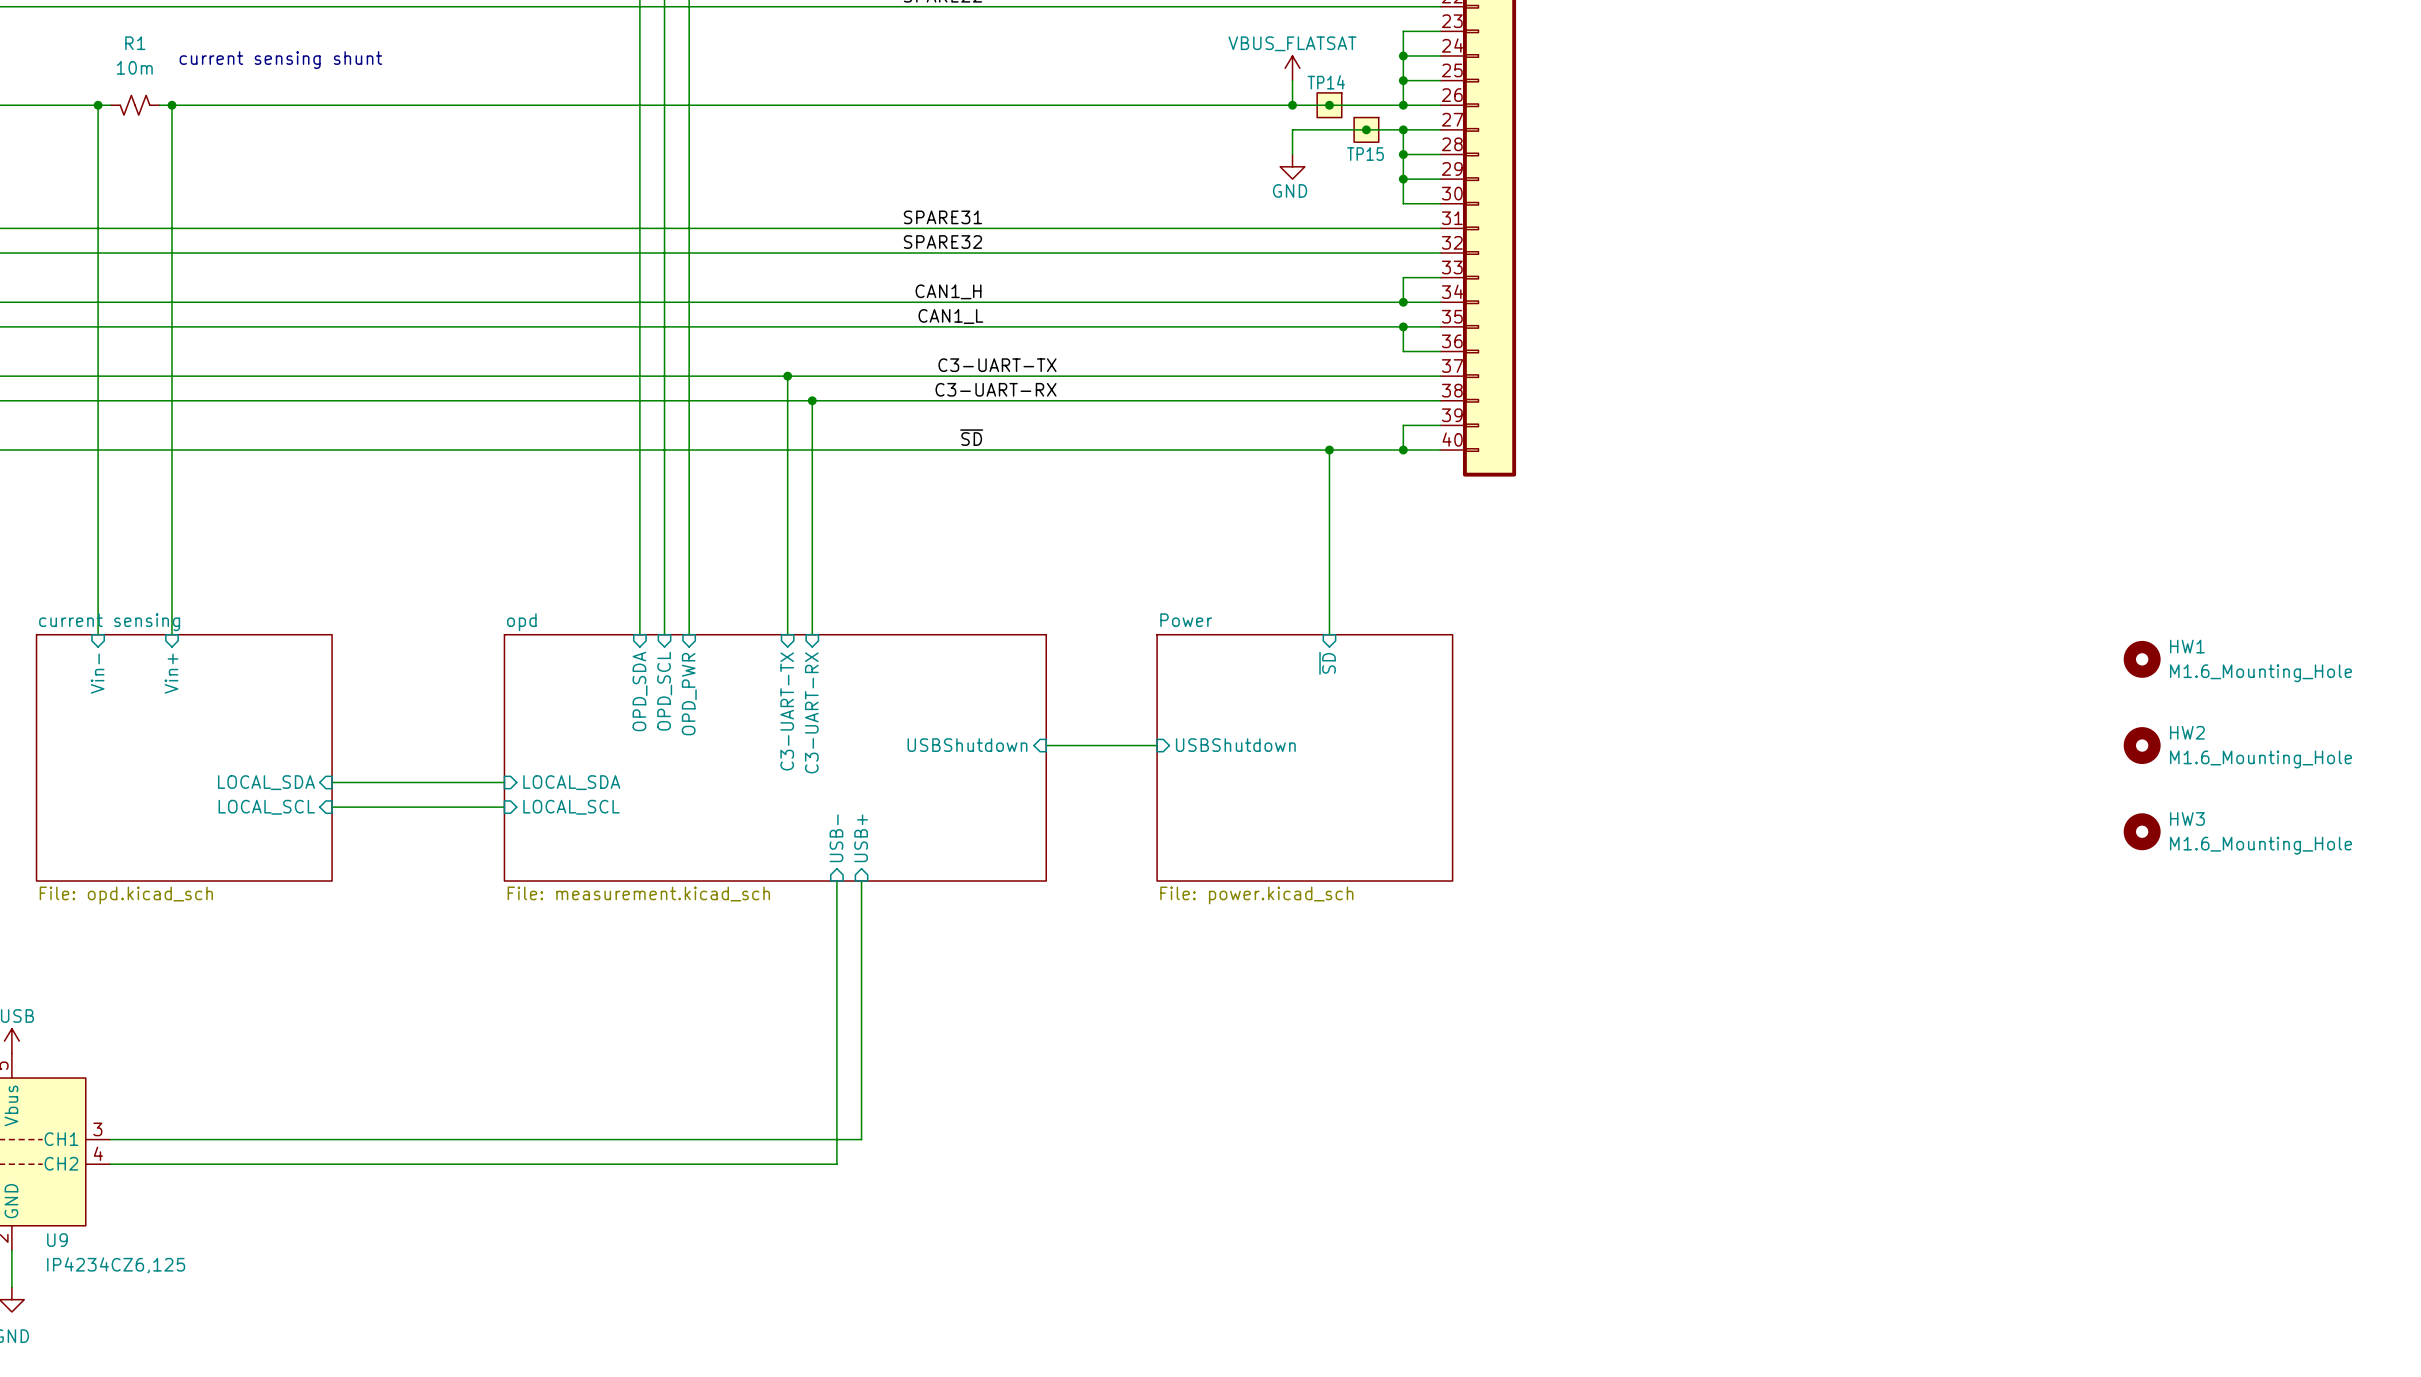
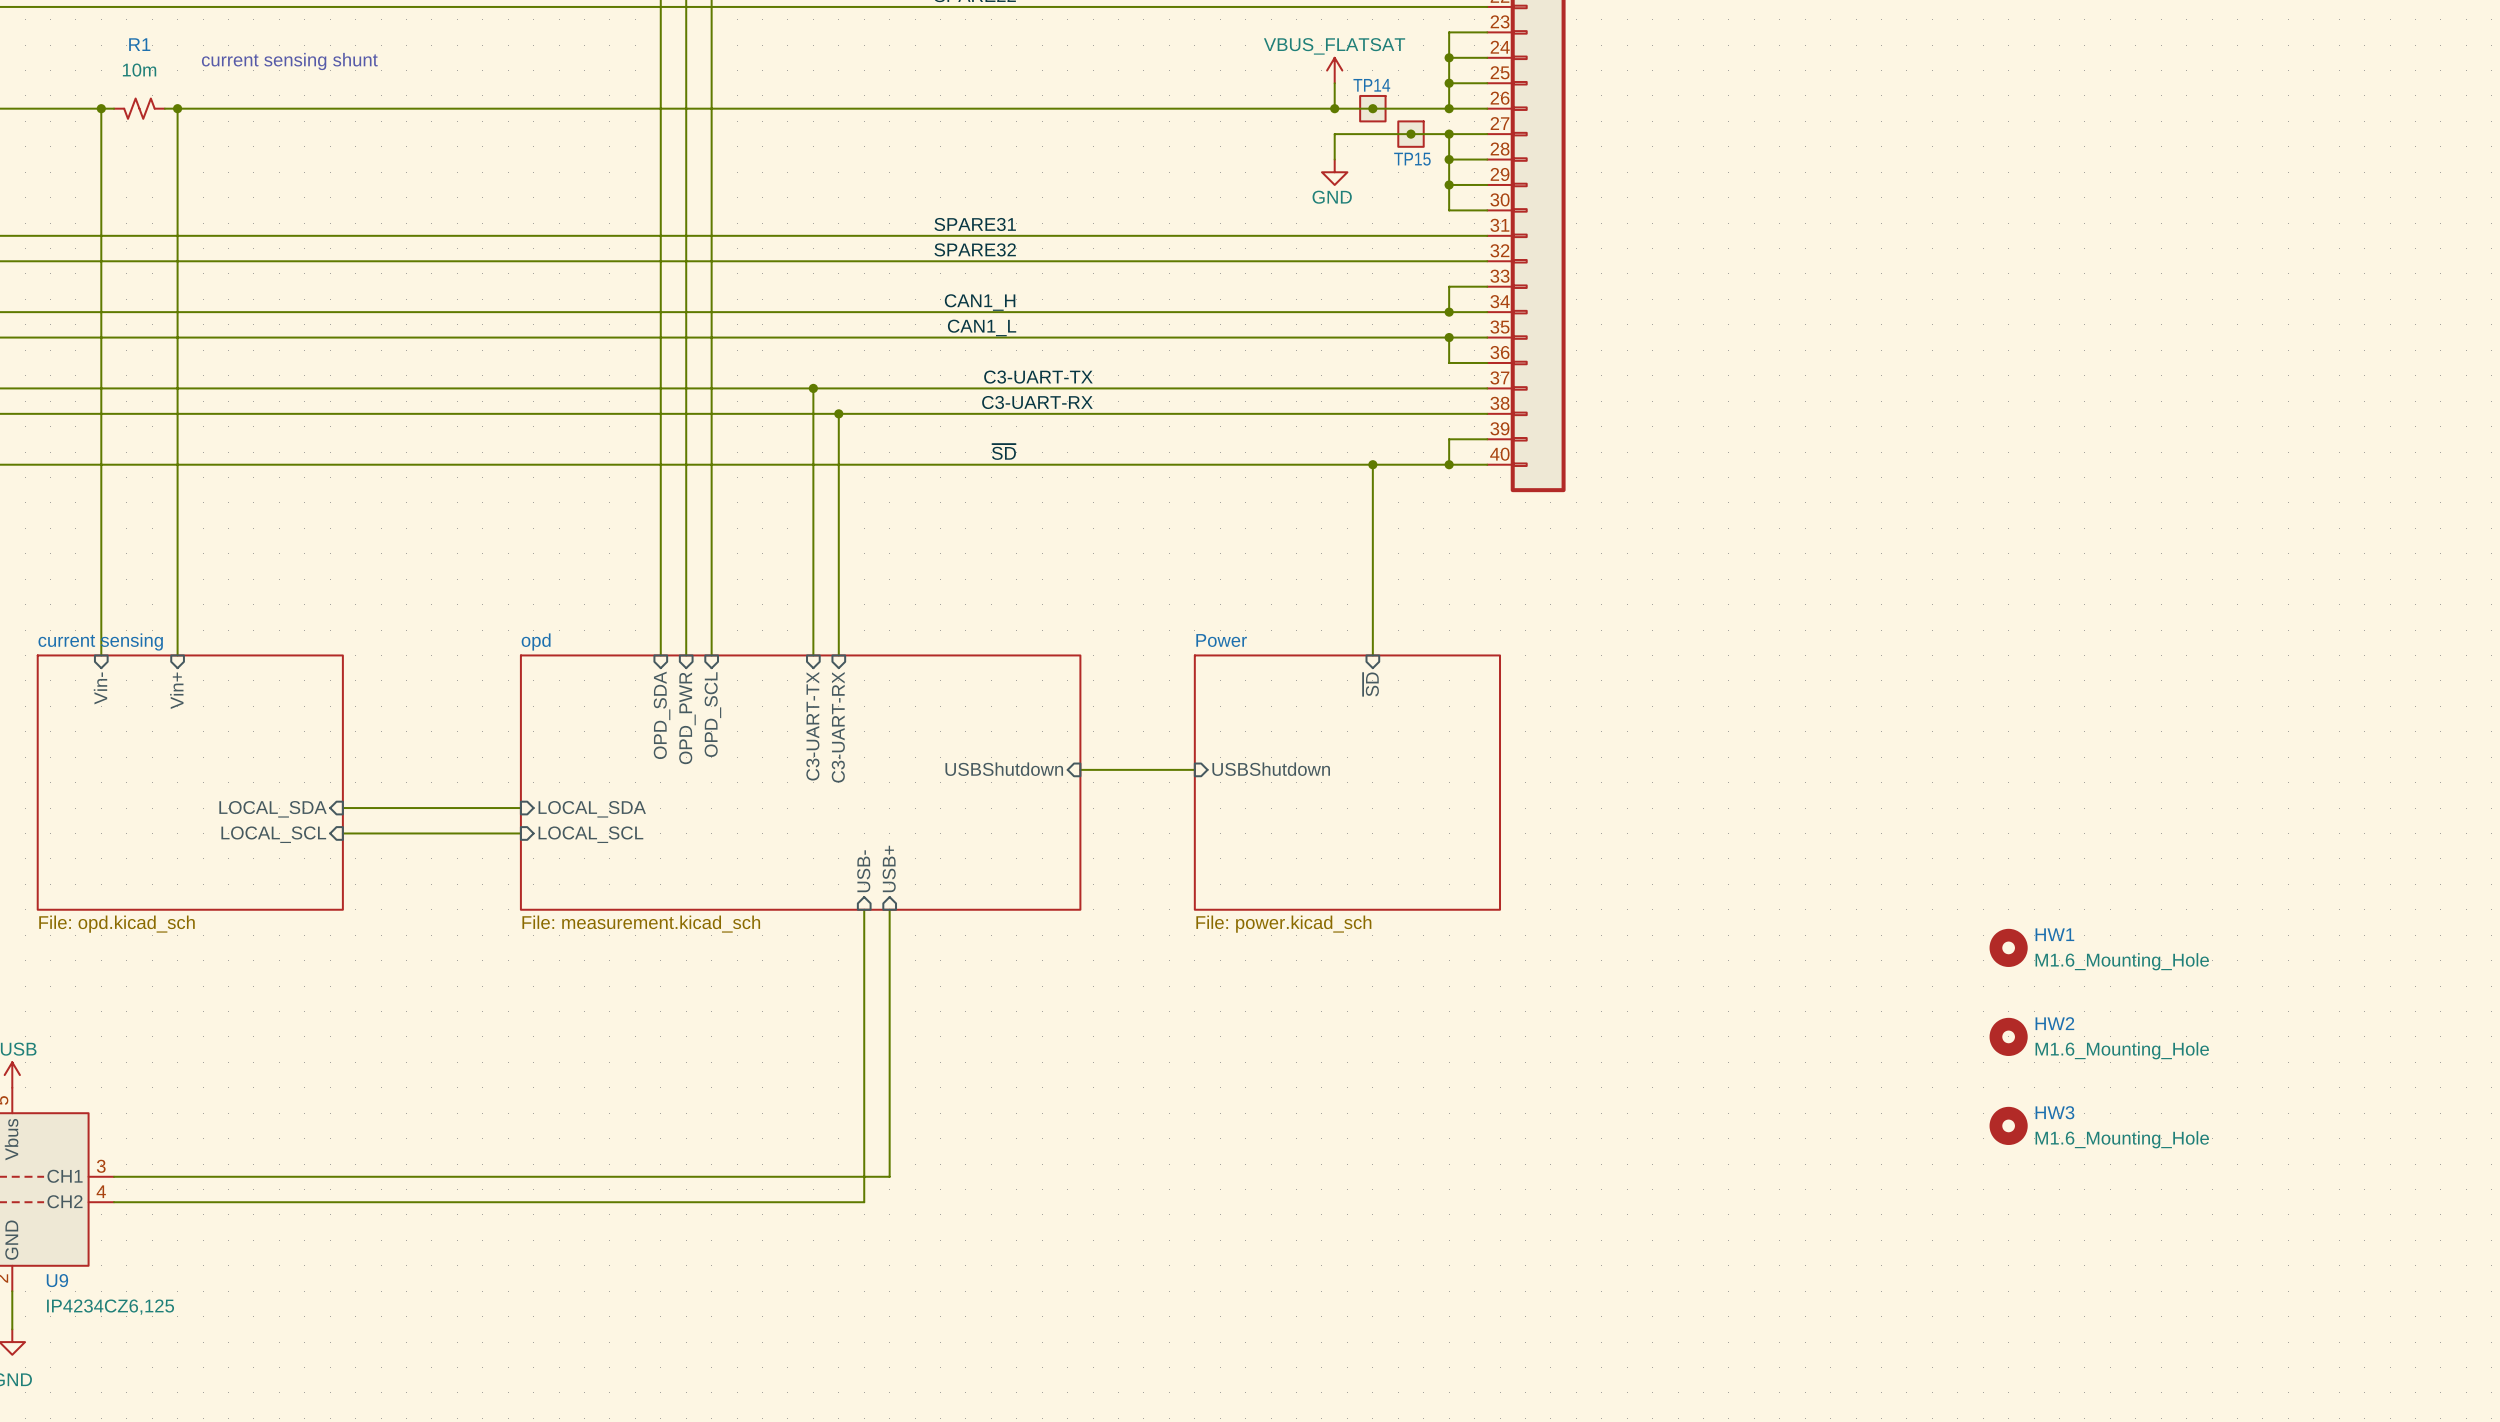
HW1 position: (2142, 659) -> (2008, 947)
sheet pin: OPD_SCL (664, 691) -> OPD_PWR (687, 718)
sheet pin: OPD_PWR (689, 694) -> OPD_SCL (712, 714)
HW2 position: (2142, 745) -> (2008, 1036)
HW3 position: (2142, 831) -> (2008, 1125)

